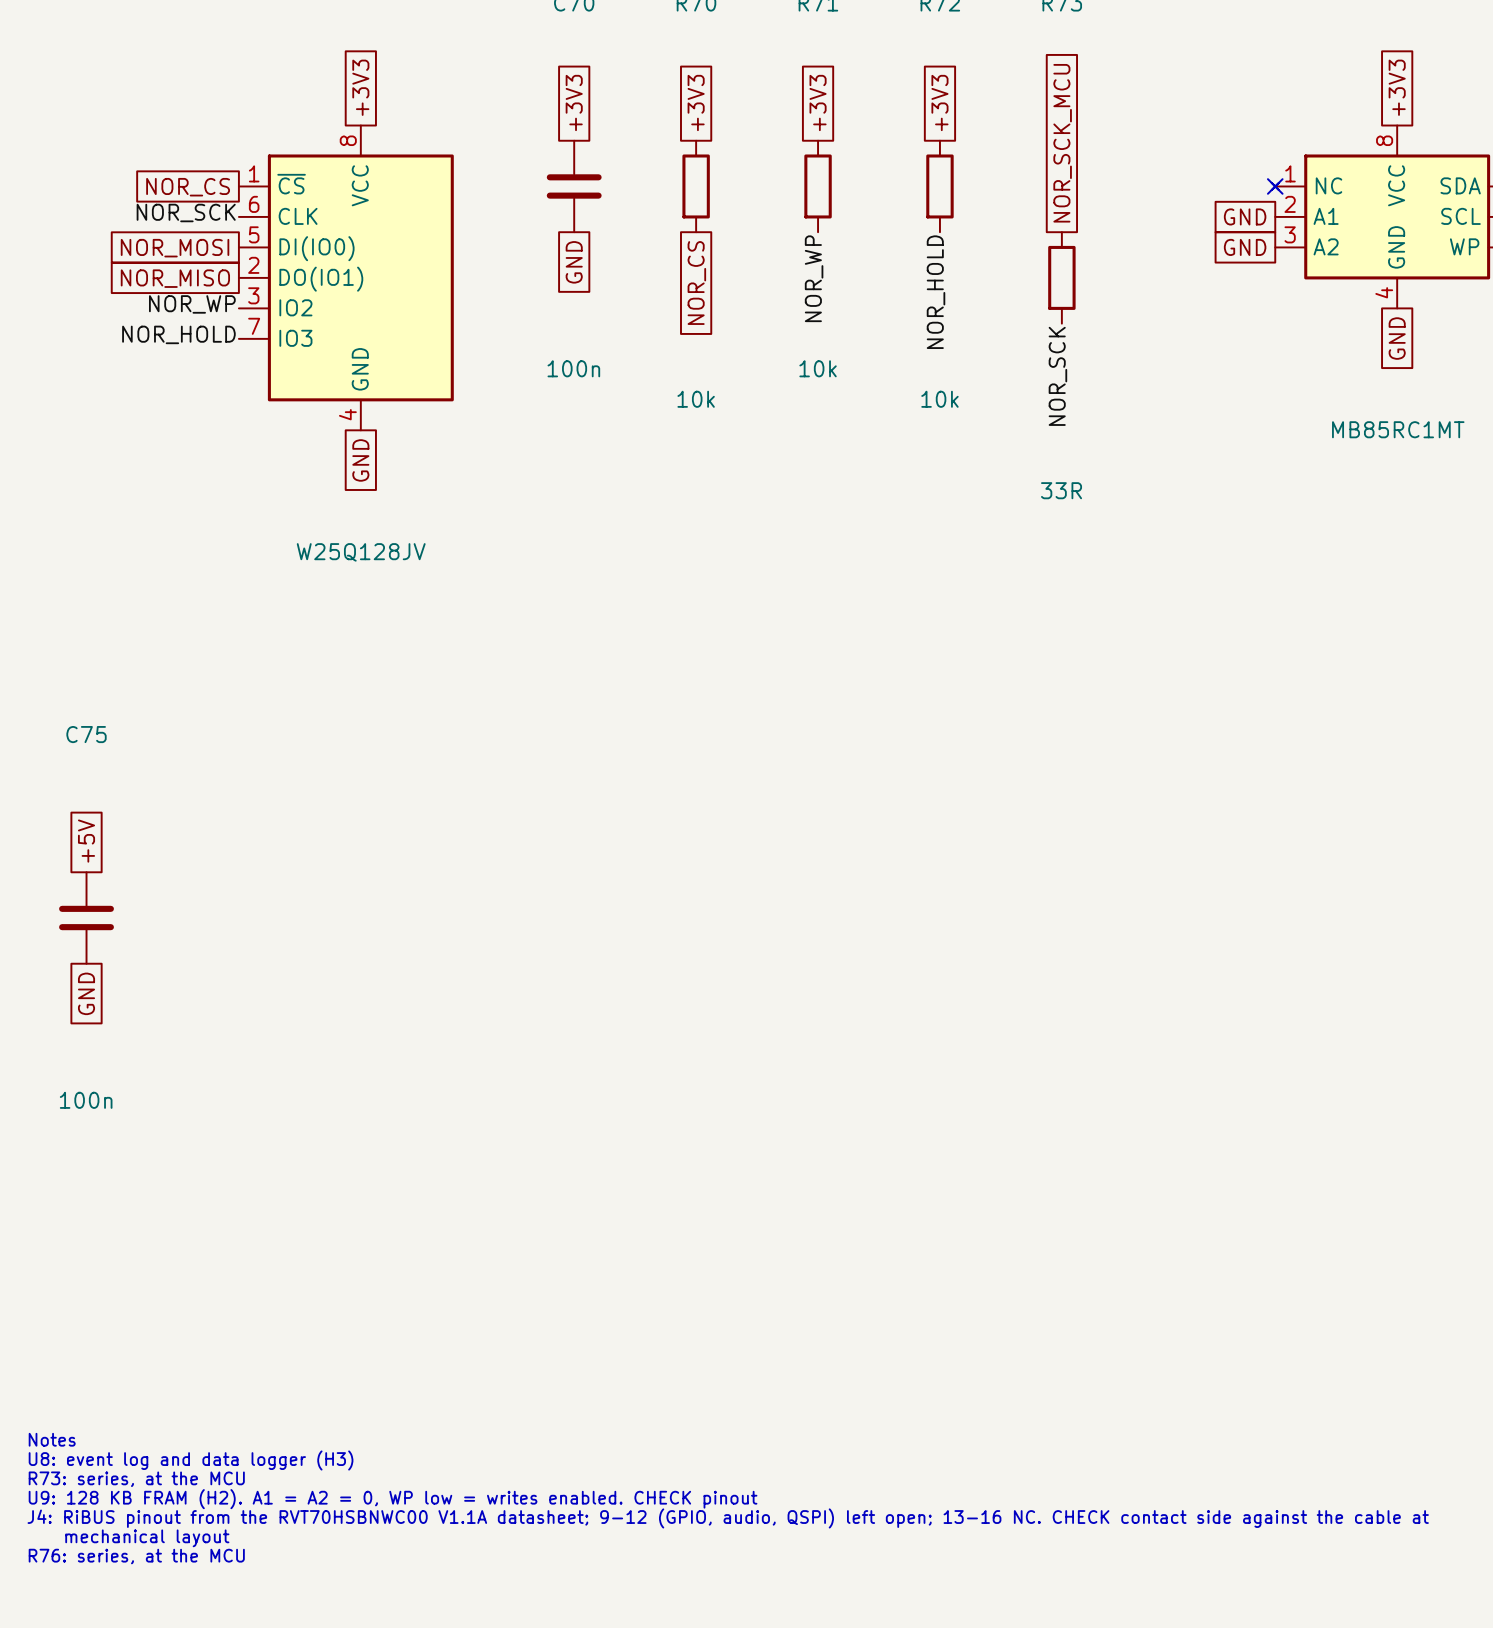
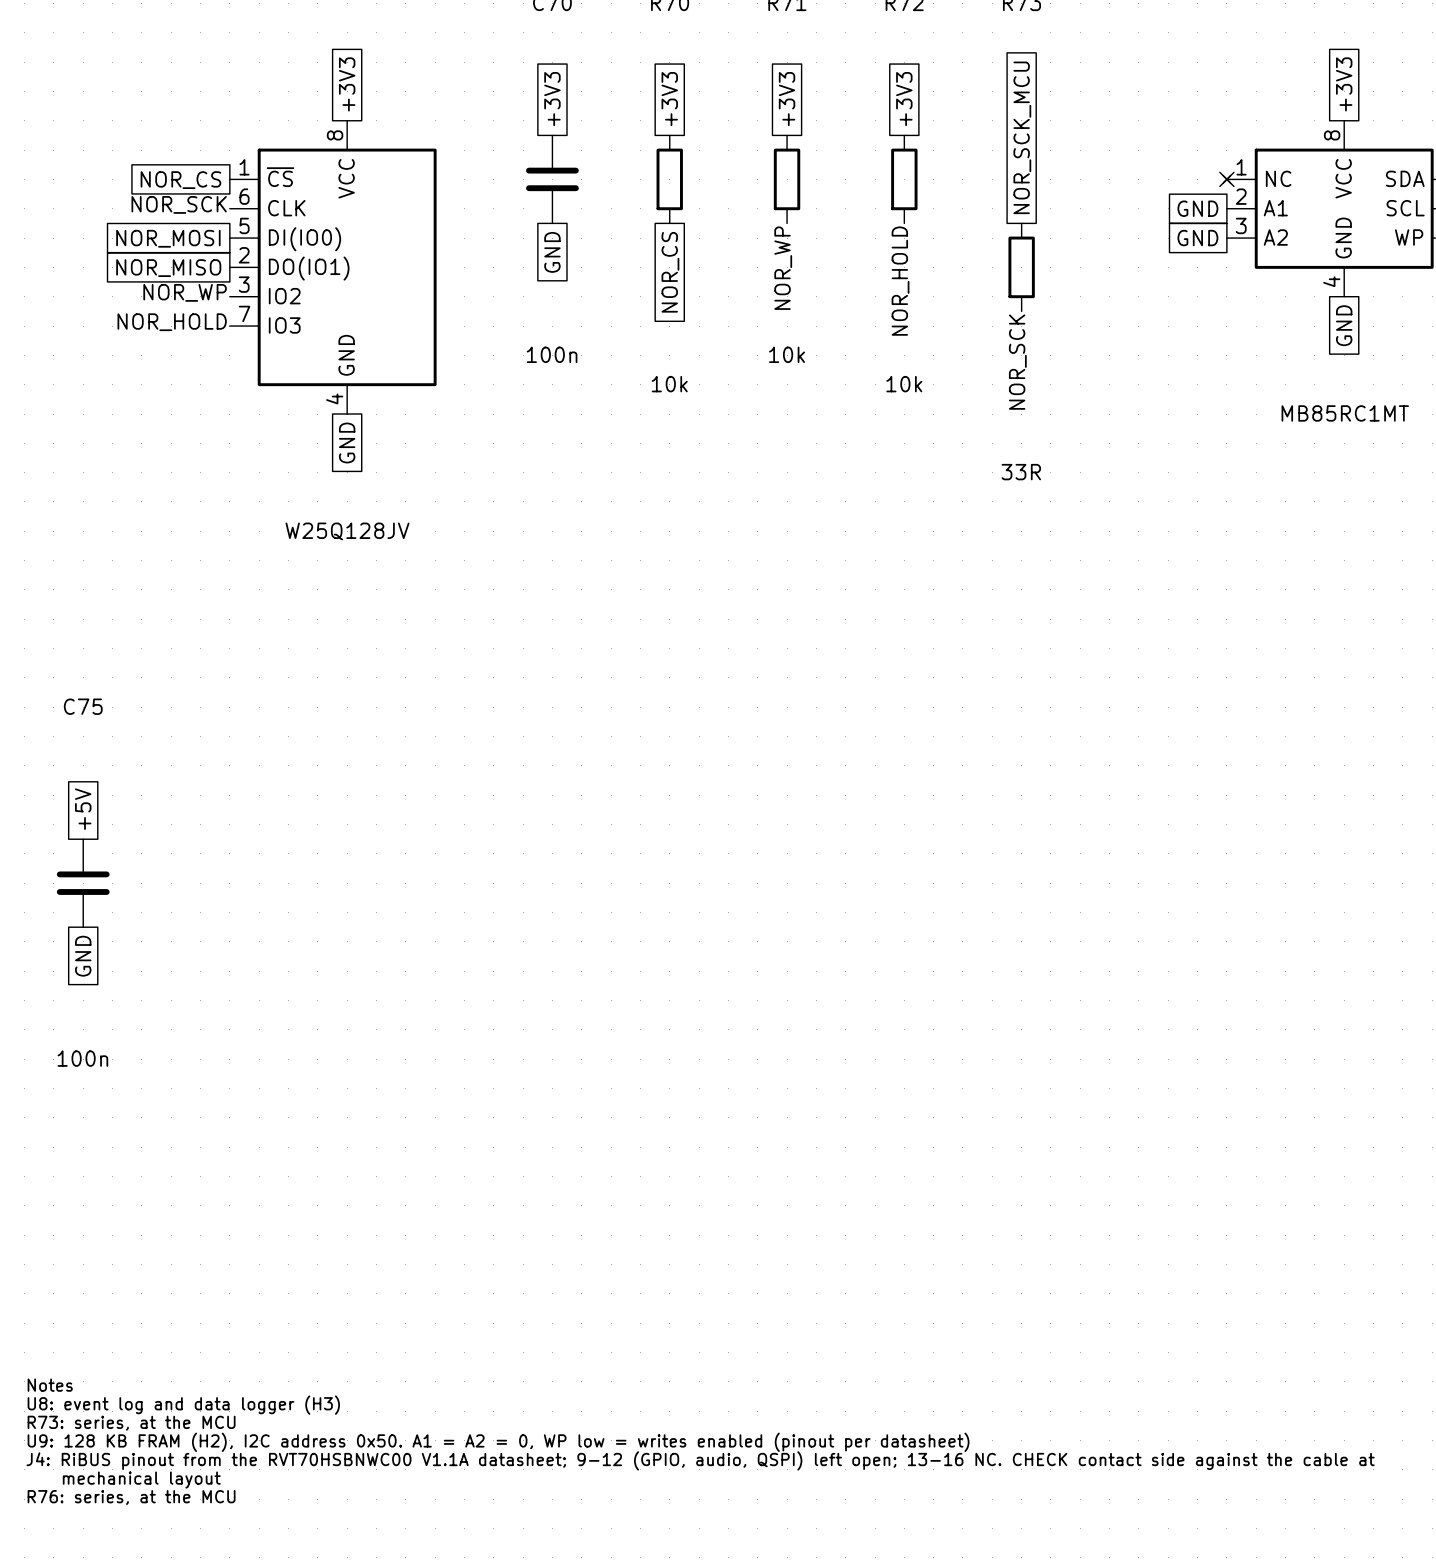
text: U9: 128 KB FRAM (H2). A1 = A2 = 0, WP low = writes enabled. CHECK pinout (393, 1499) -> U9: 128 KB FRAM (H2), I2C address 0x50. A1 = A2 = 0, WP low = writes enabled (pinout per datasheet) (498, 1442)

